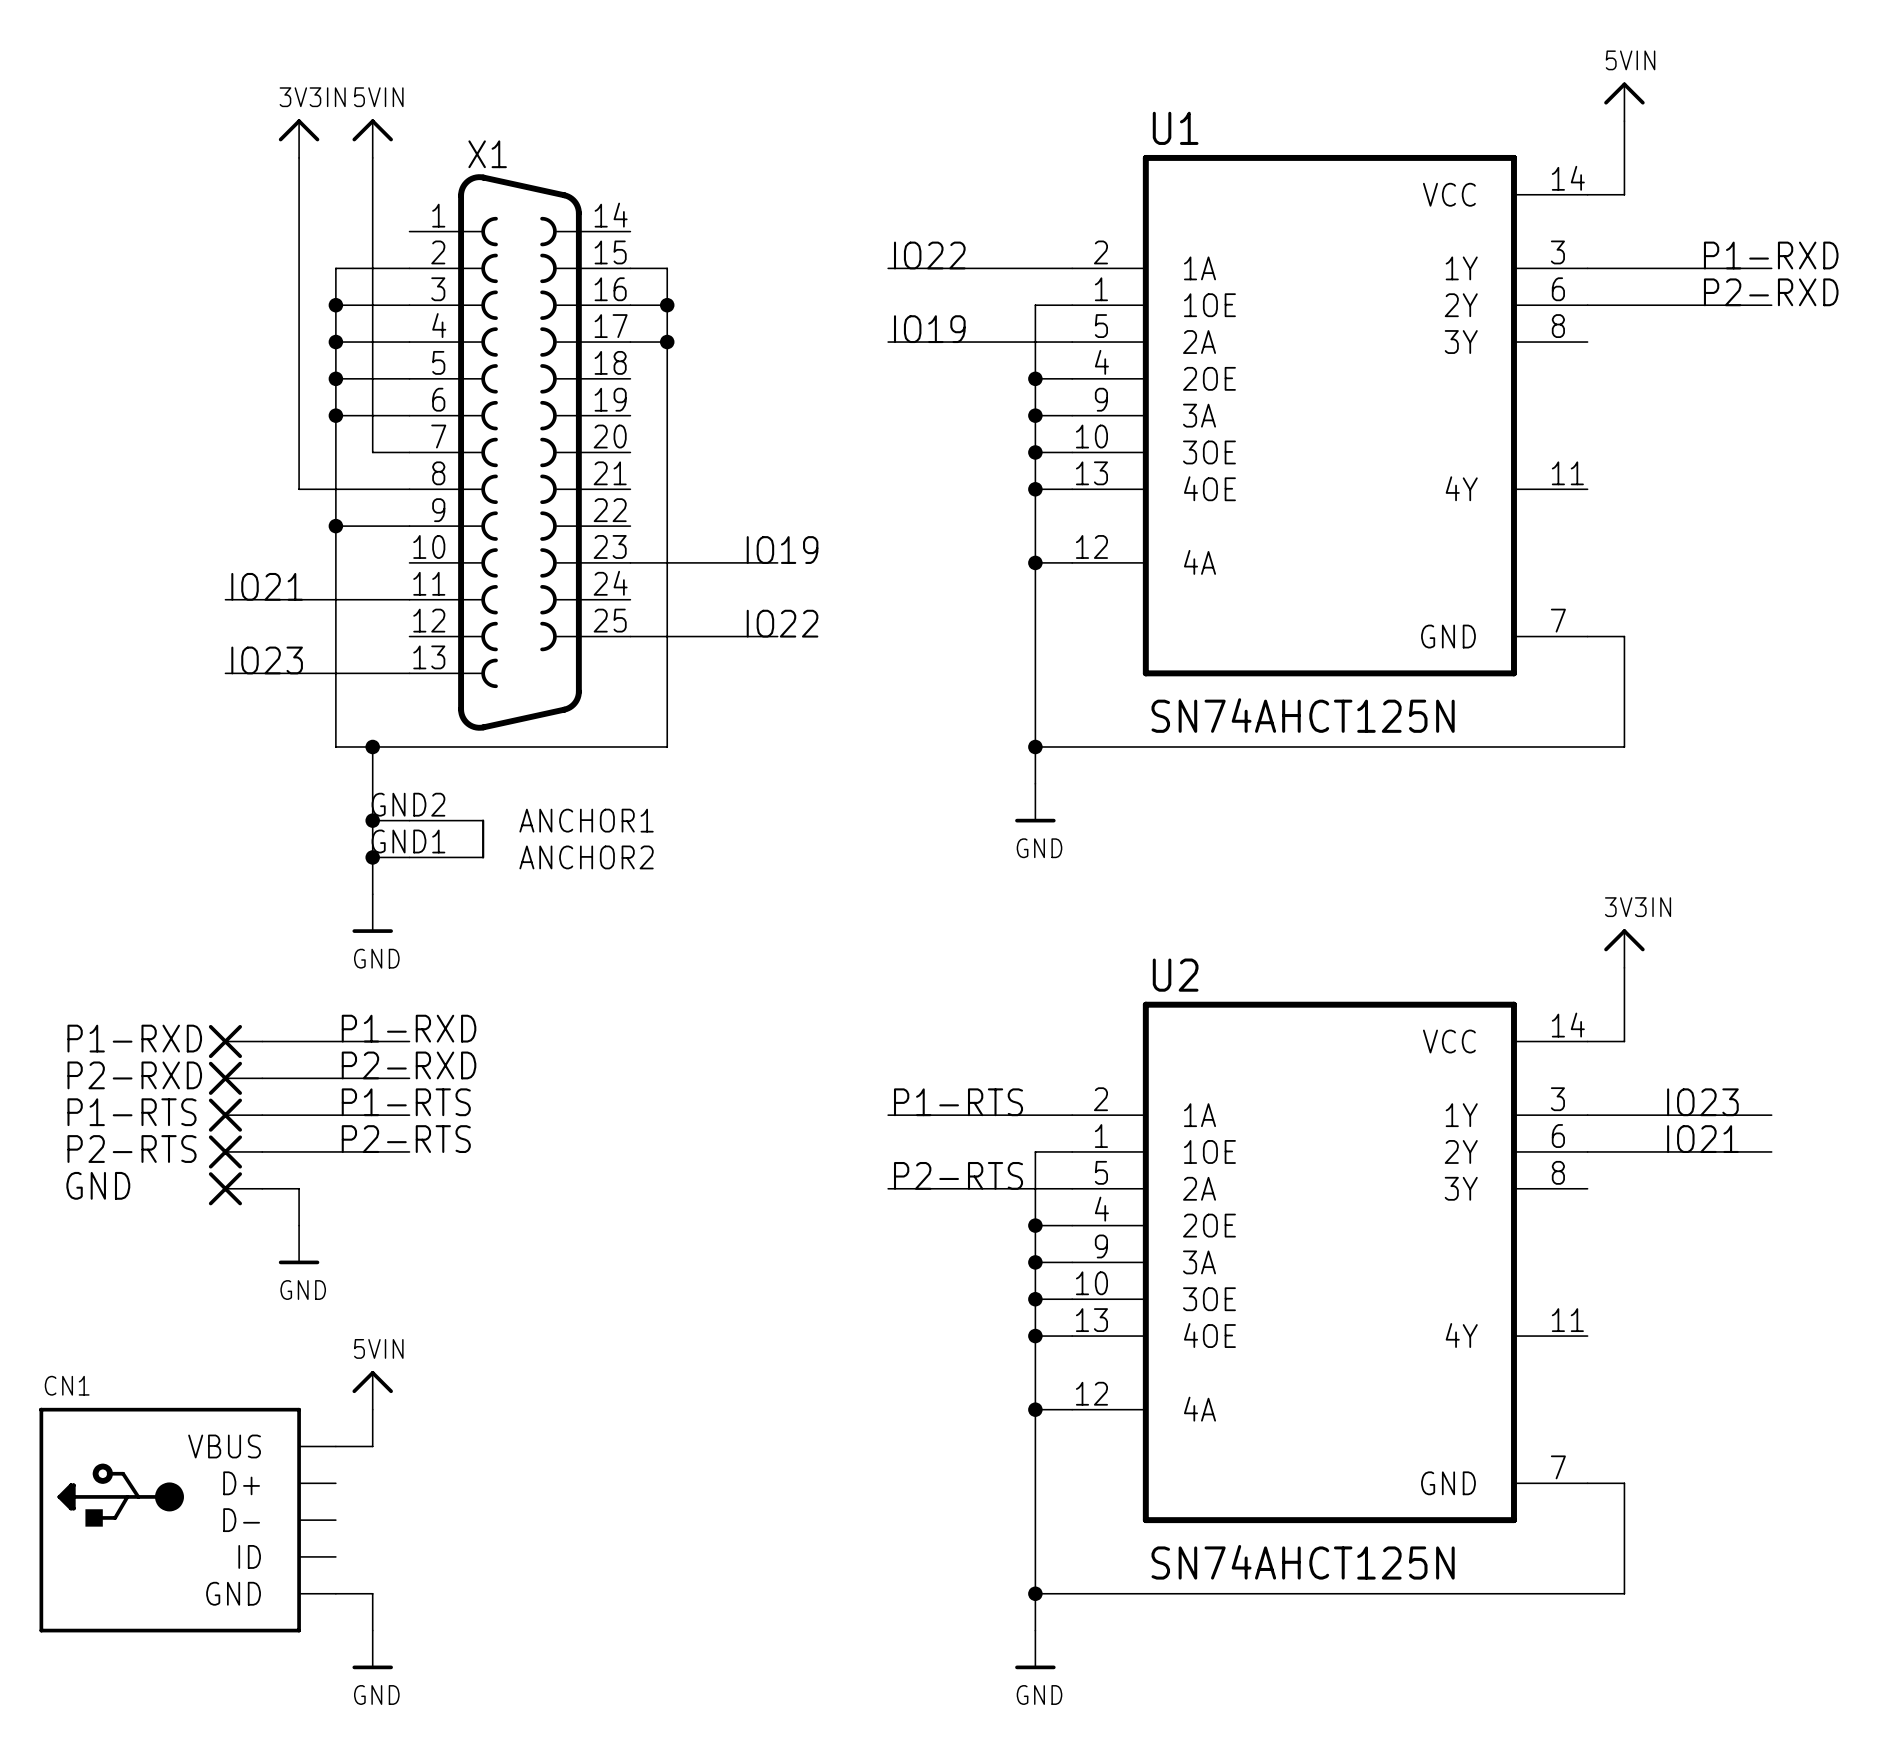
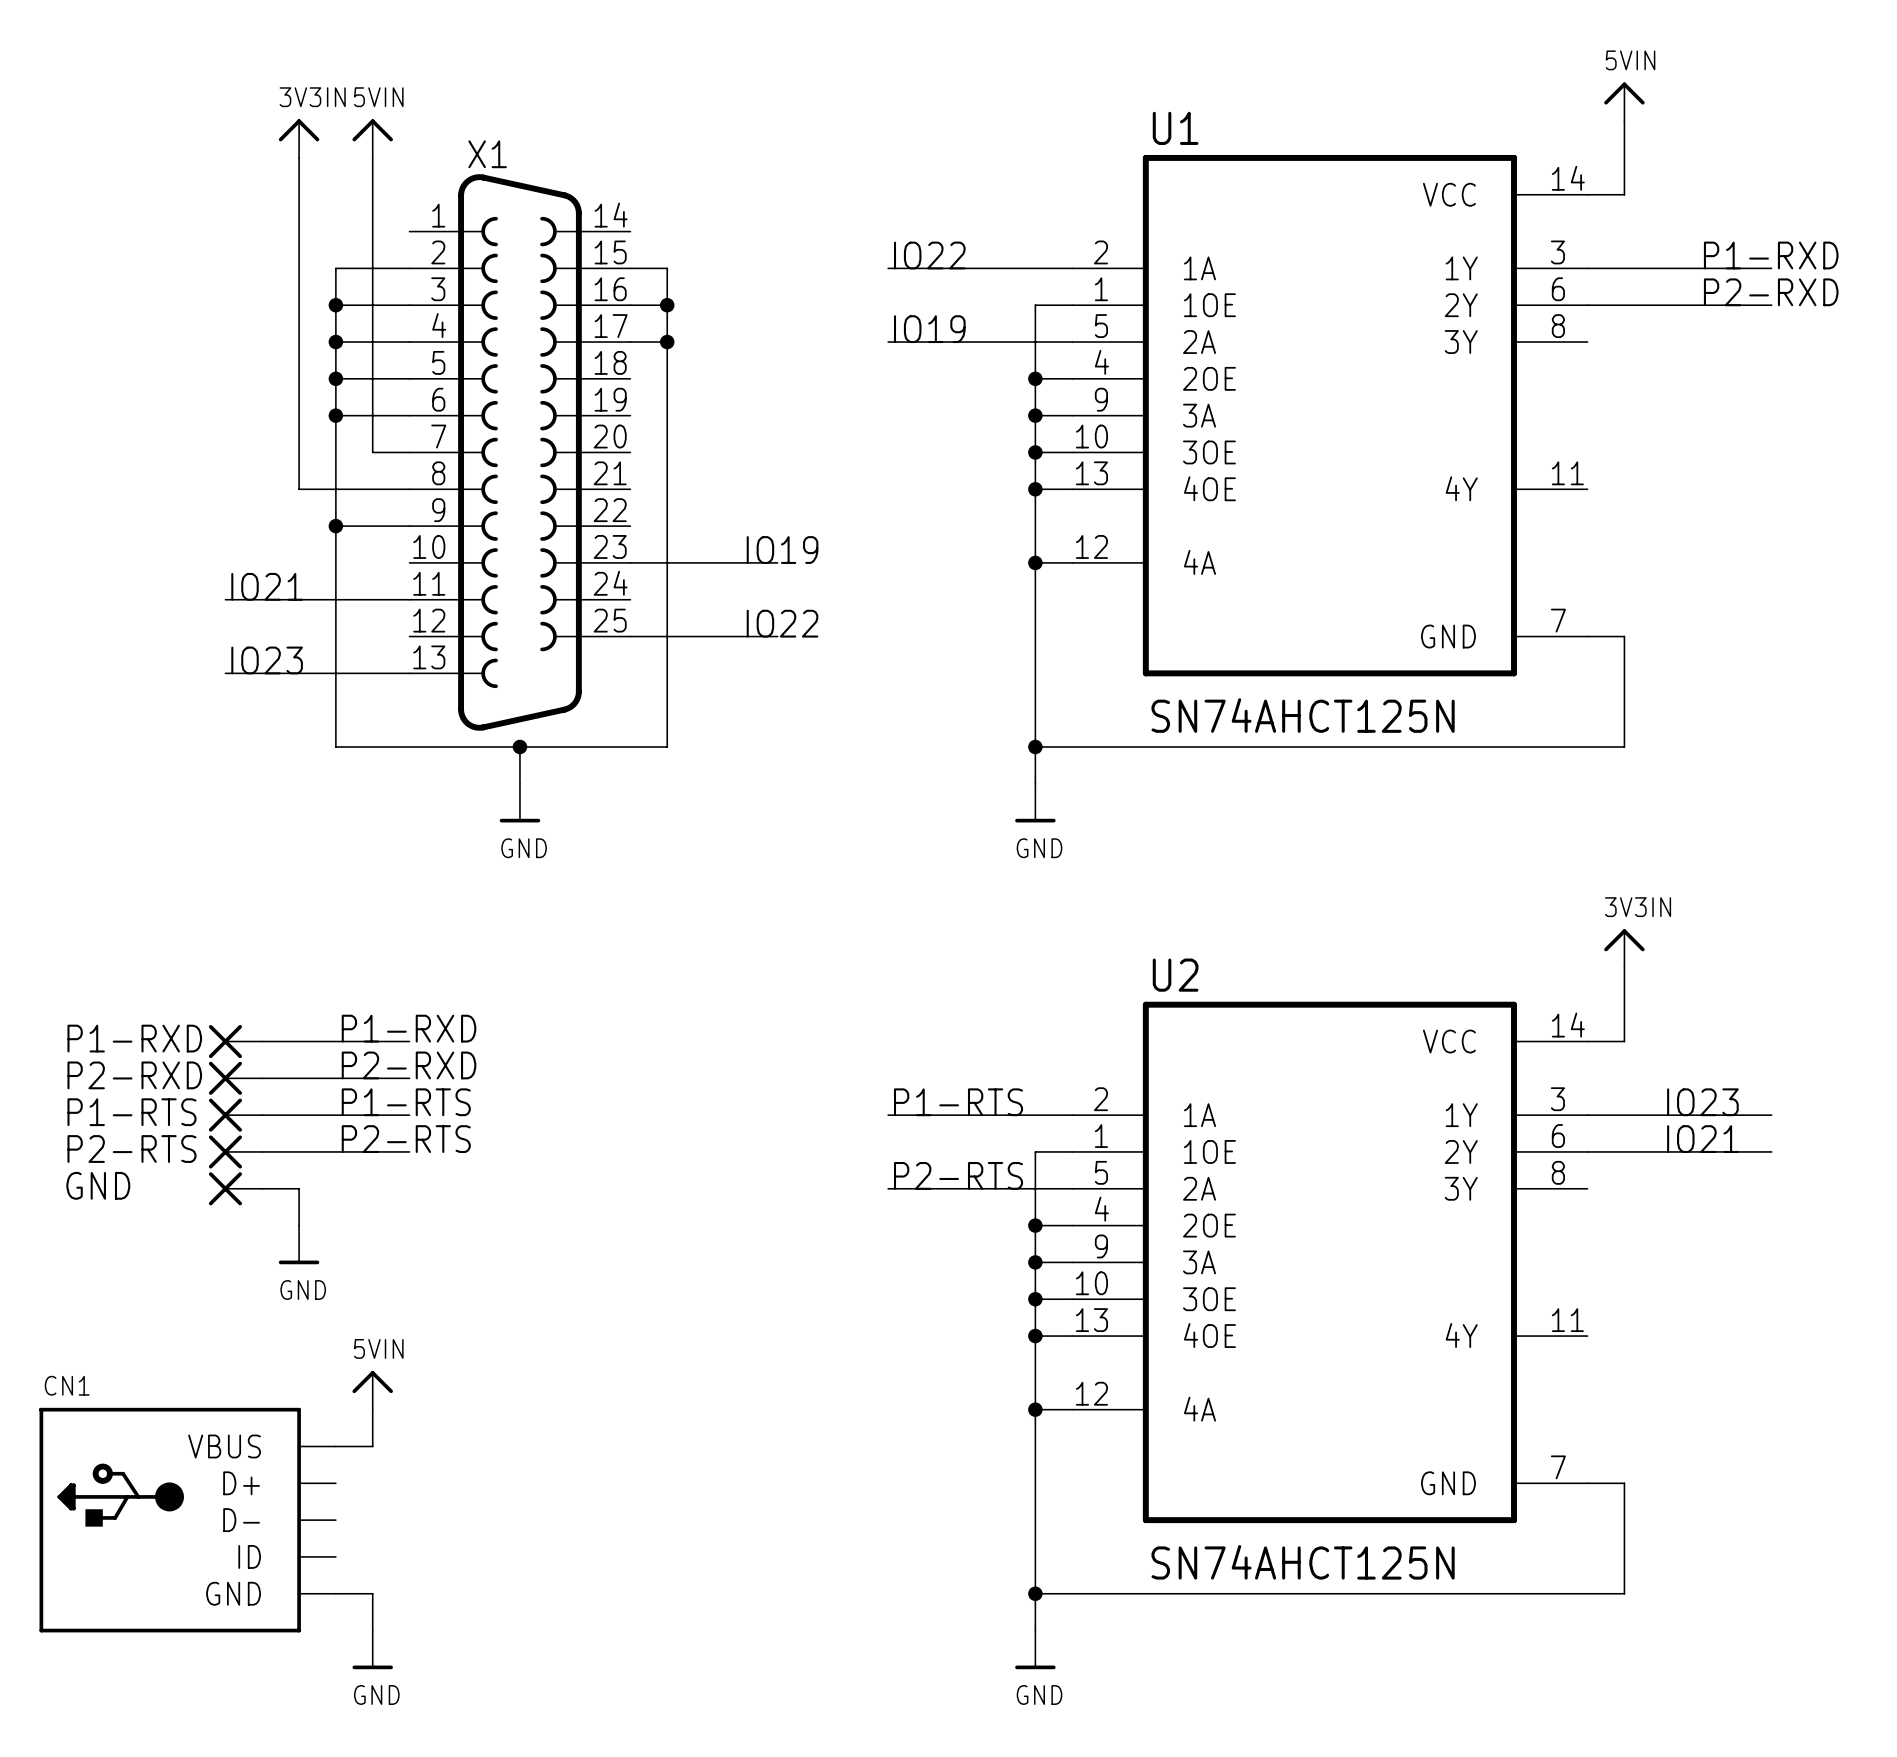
X1 symbol: [409, 174, 631, 859] -> [409, 174, 631, 731]
wire: (372, 746) (372, 894) -> none
junction: (372, 746) -> none
wire: none -> (519, 746) (519, 783)
junction: none -> (519, 746)
wire: (372, 820) (409, 820) -> none
junction: (372, 820) -> none
wire: (372, 857) (409, 857) -> none
junction: (372, 857) -> none
power symbol position: GND (372, 913) -> GND (519, 803)

